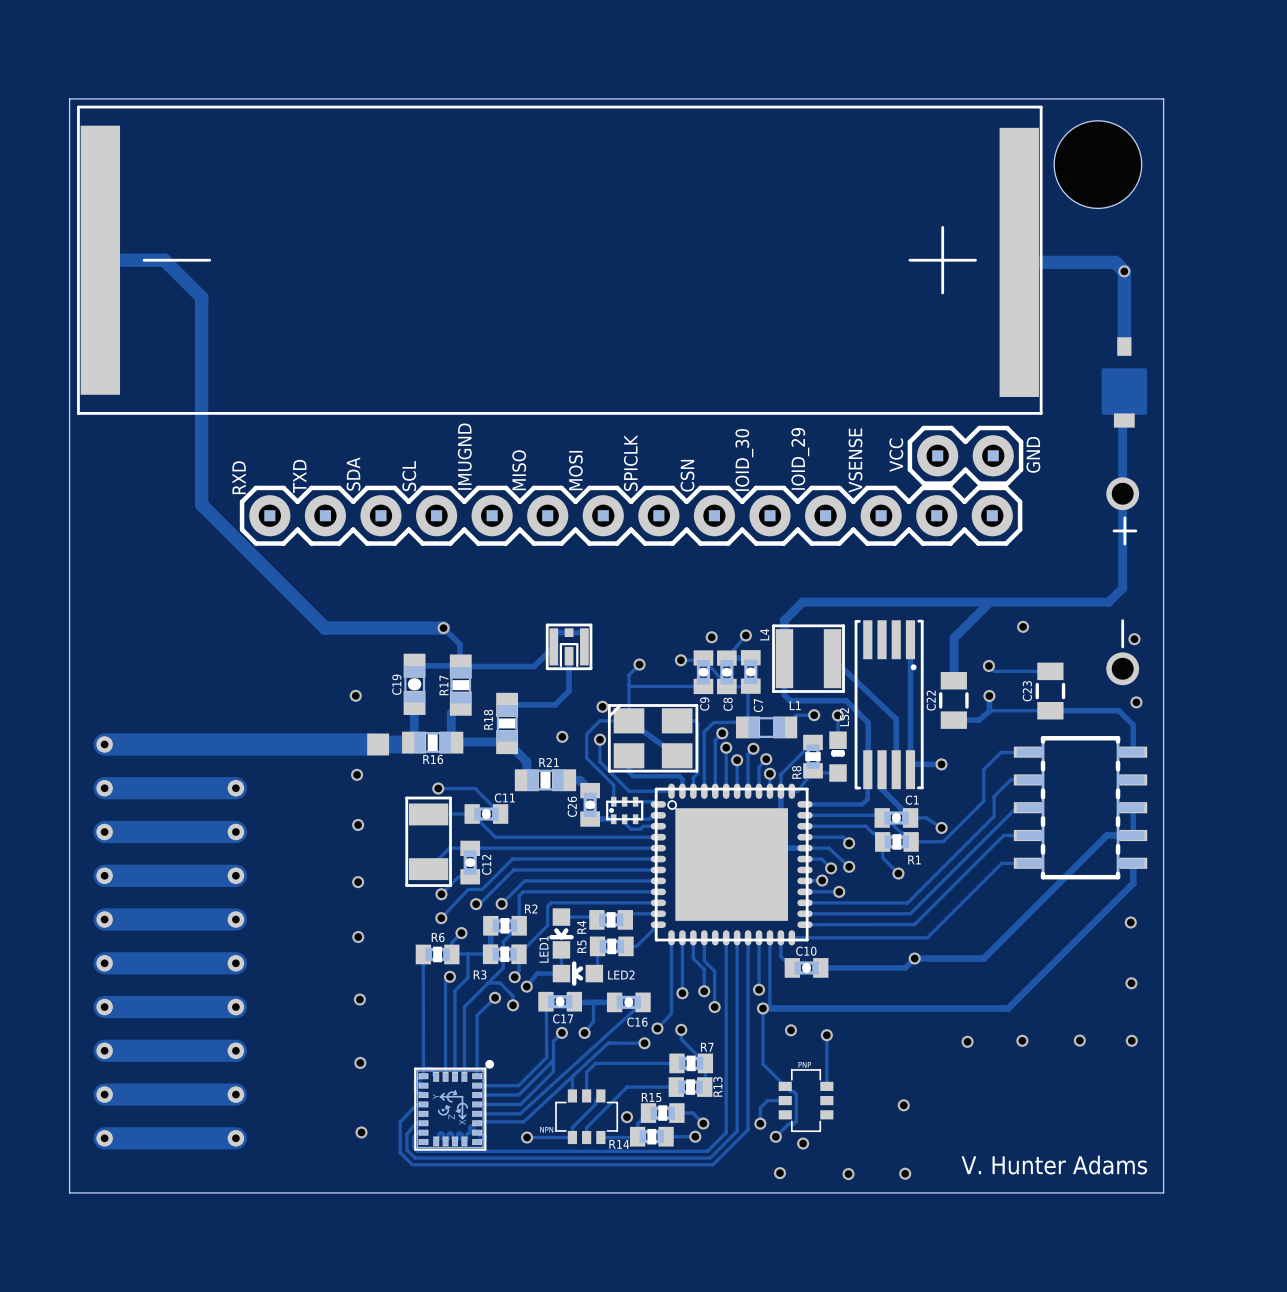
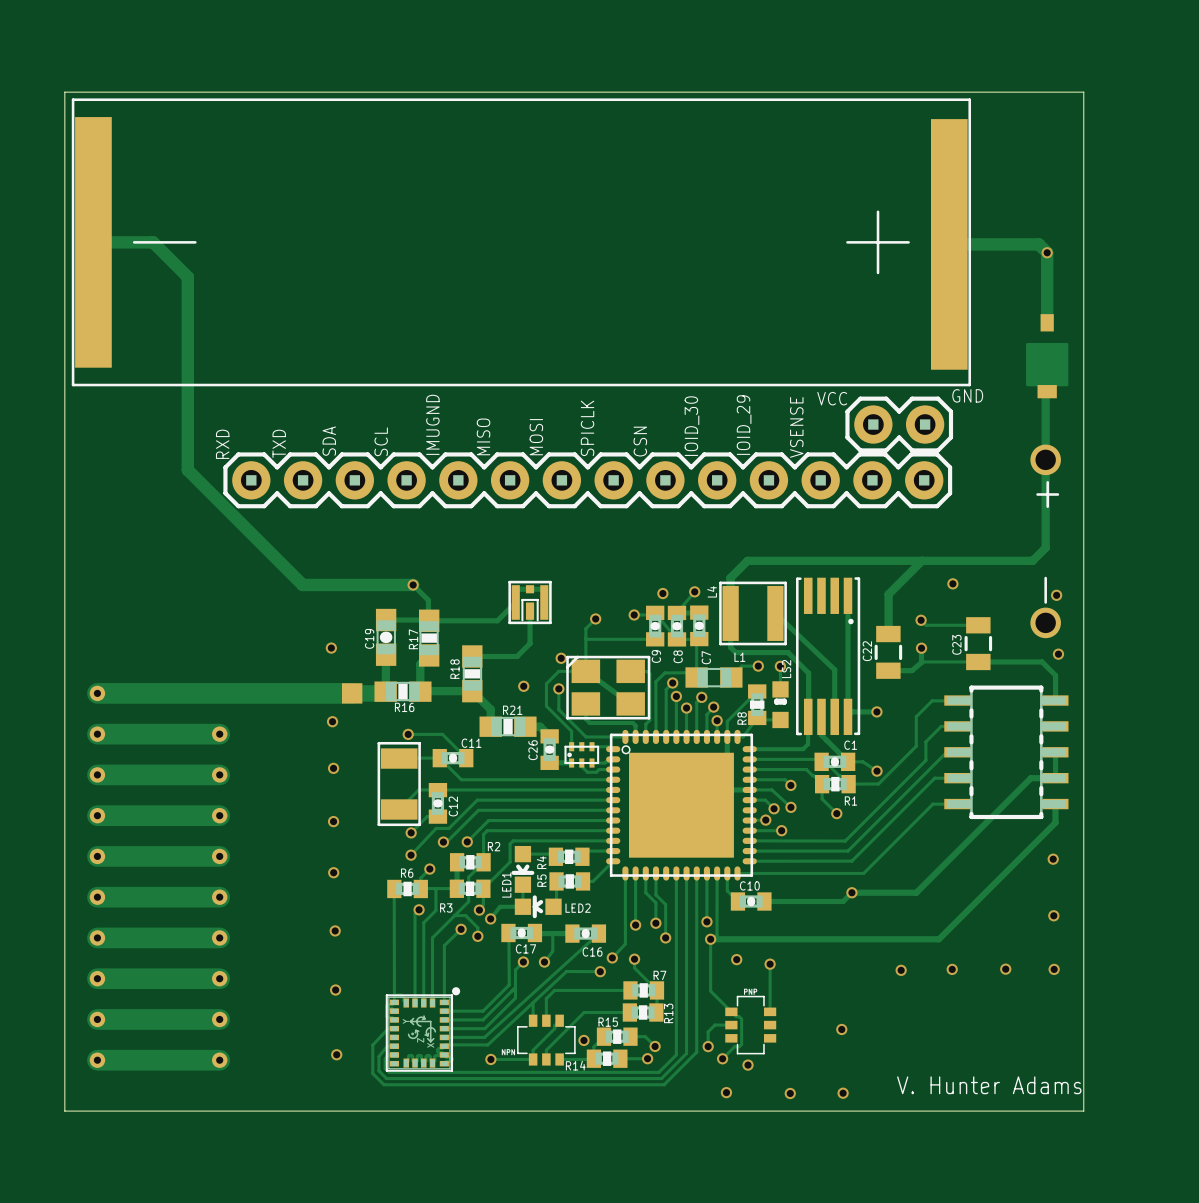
hole: (1097, 164) -> none
text rotation: 0° (1033, 454) -> 90° clockwise (967, 395)
text rotation: 0° (896, 455) -> 90° clockwise (832, 398)

